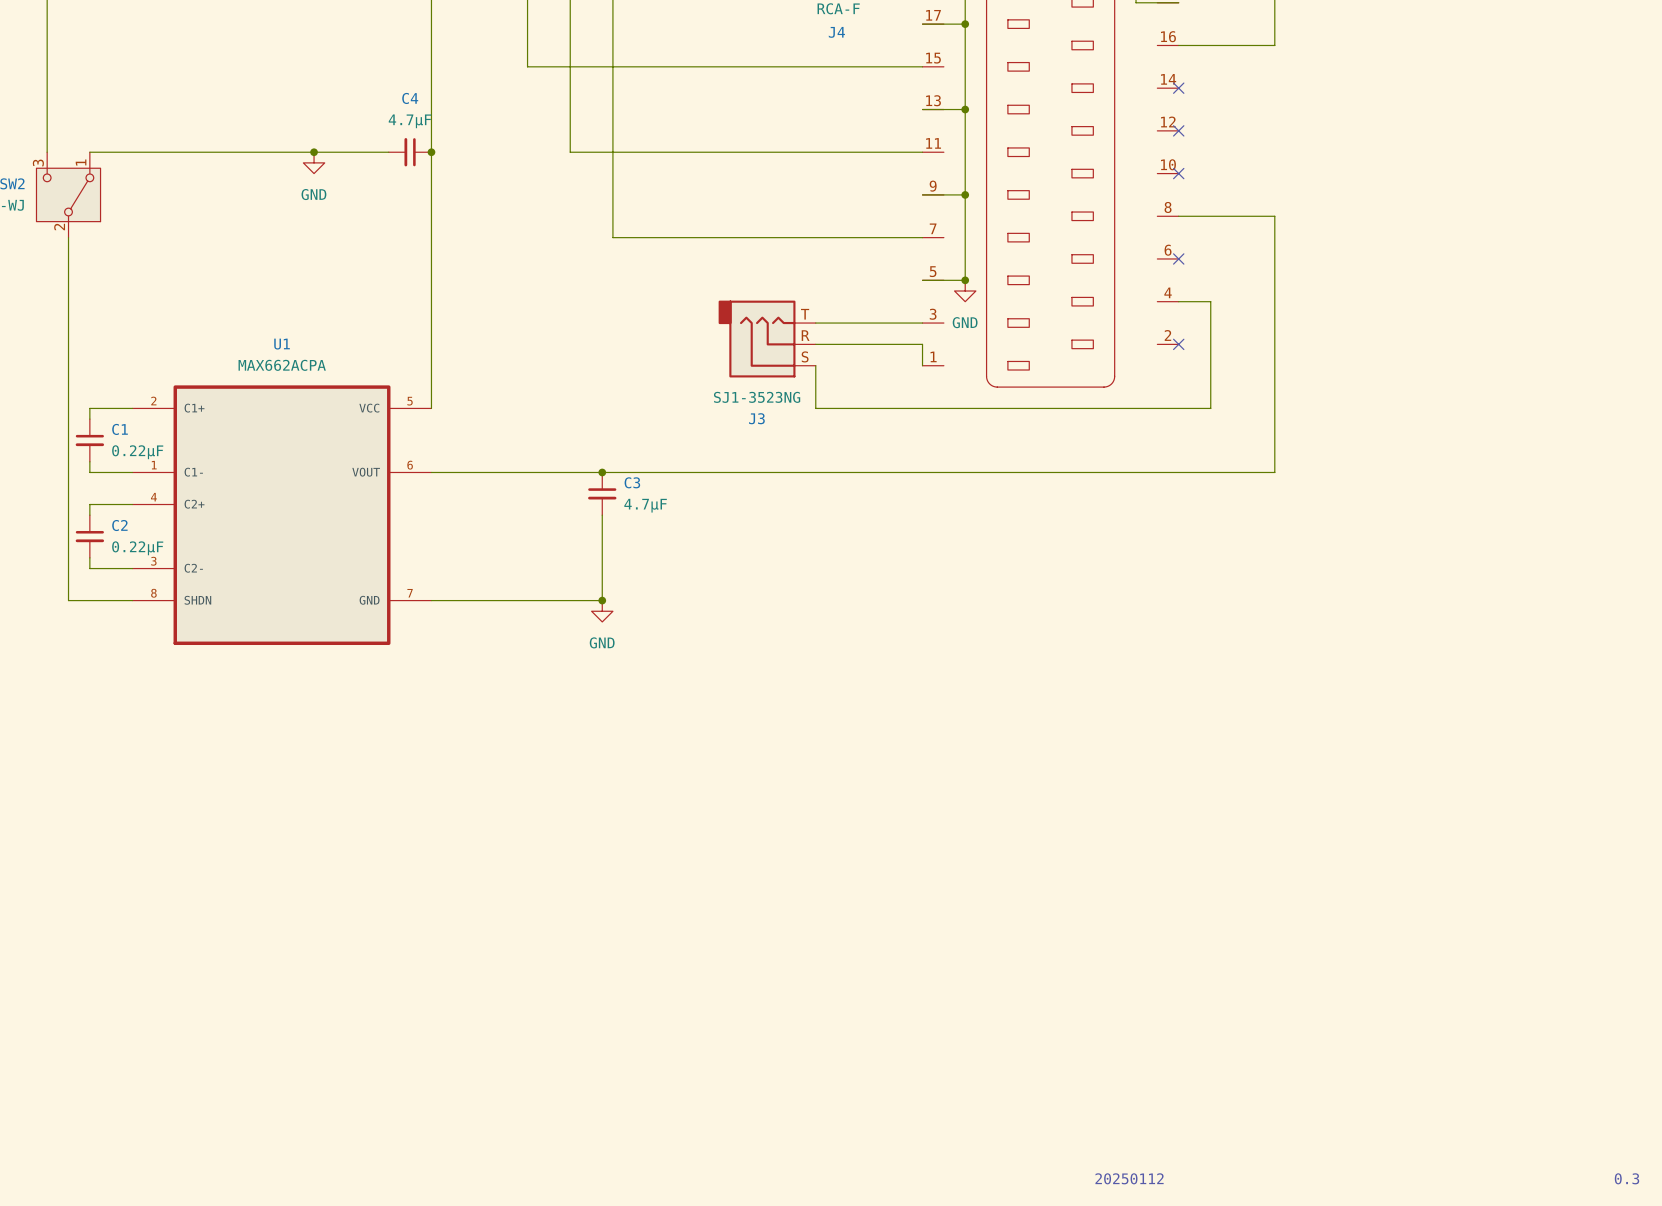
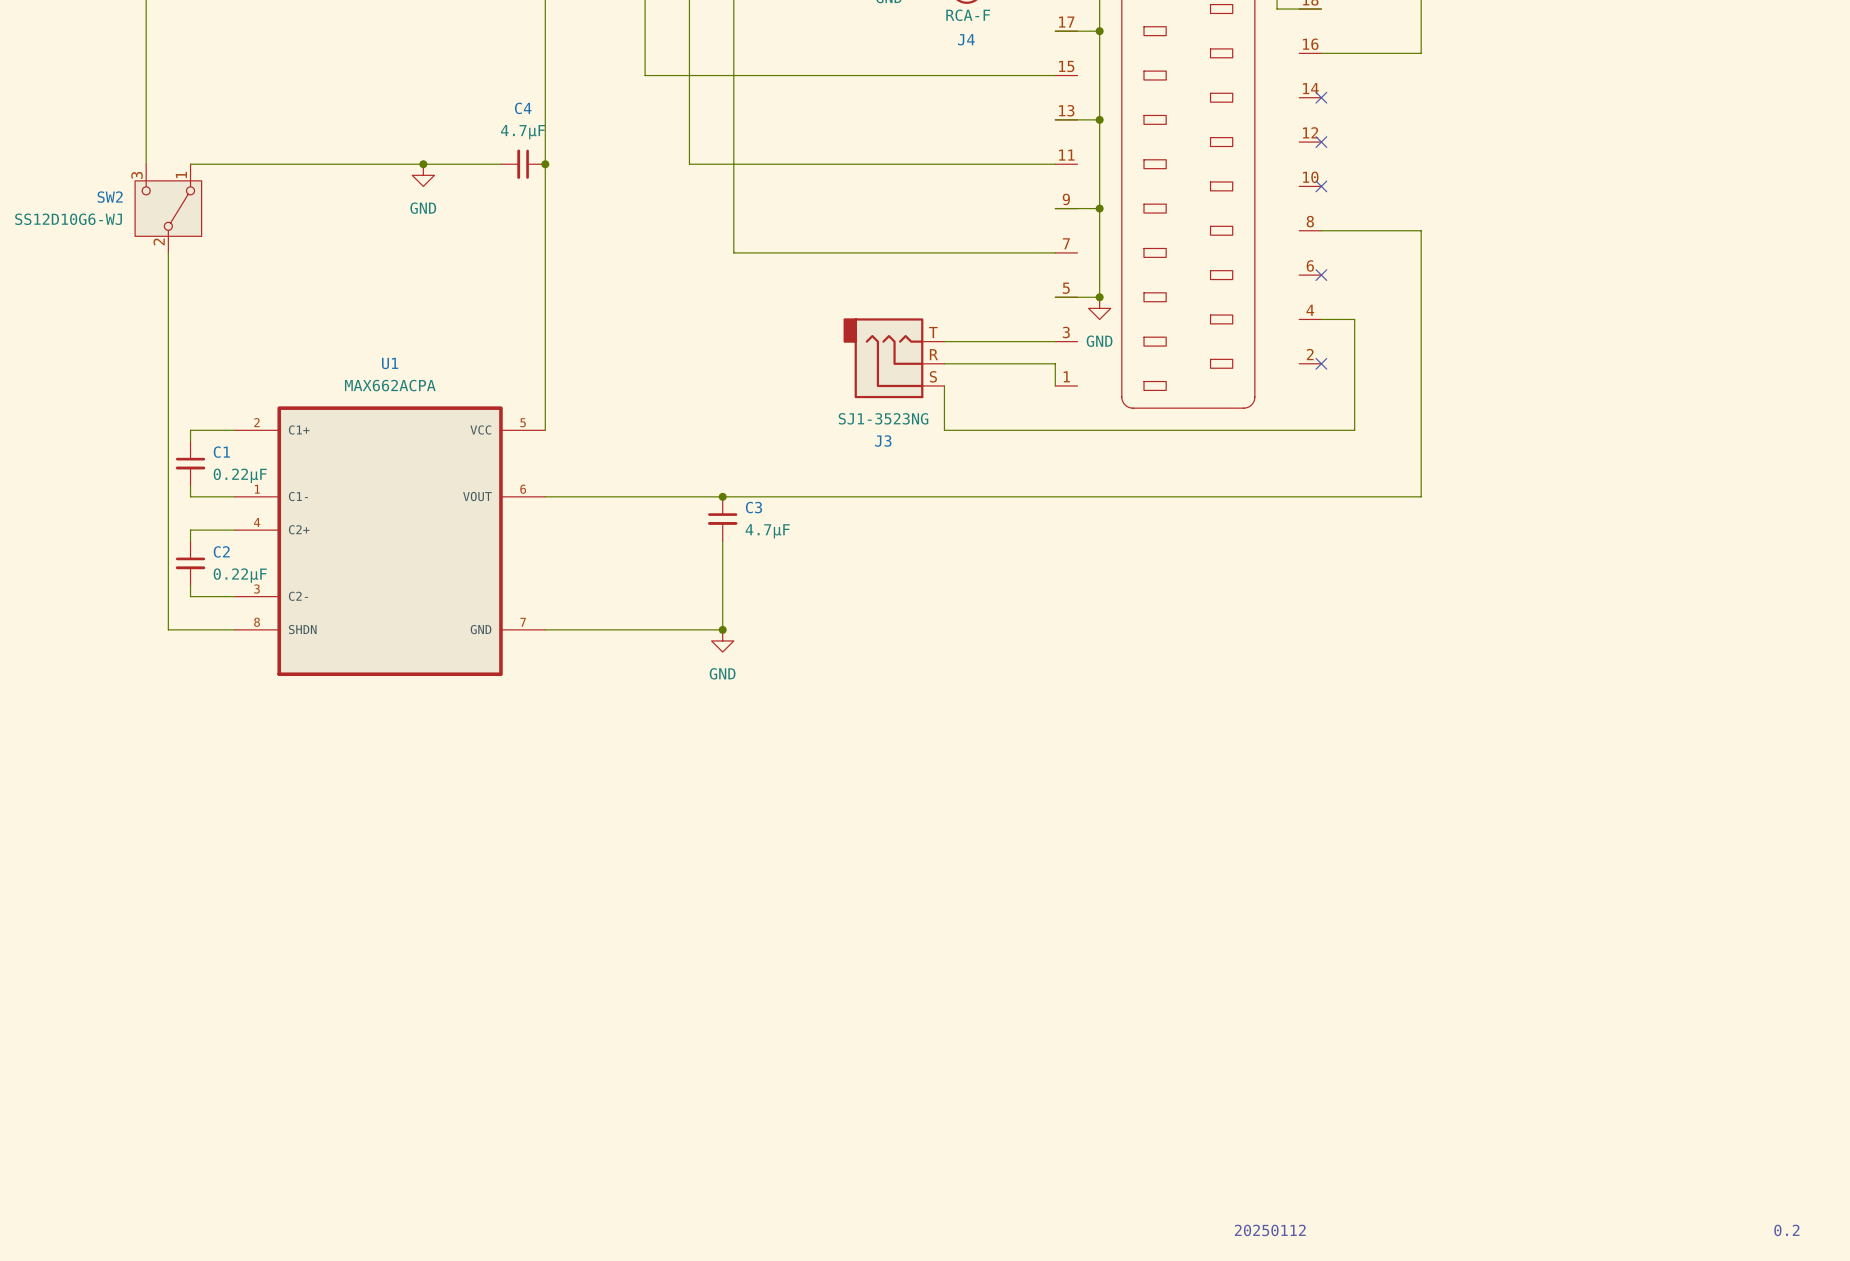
text: 0.3 (1627, 1178) -> 0.2 (1786, 1230)

